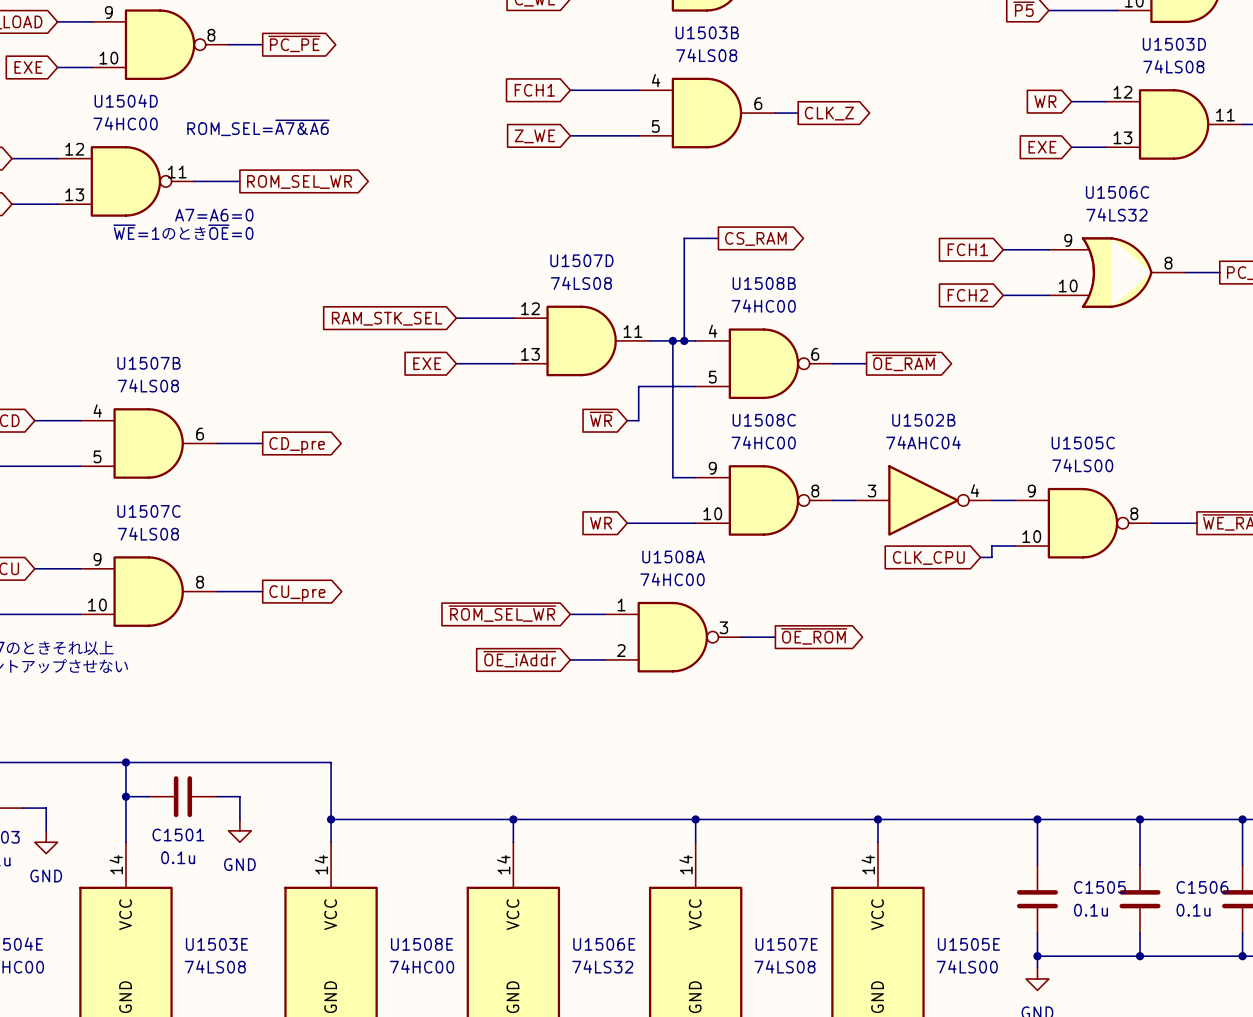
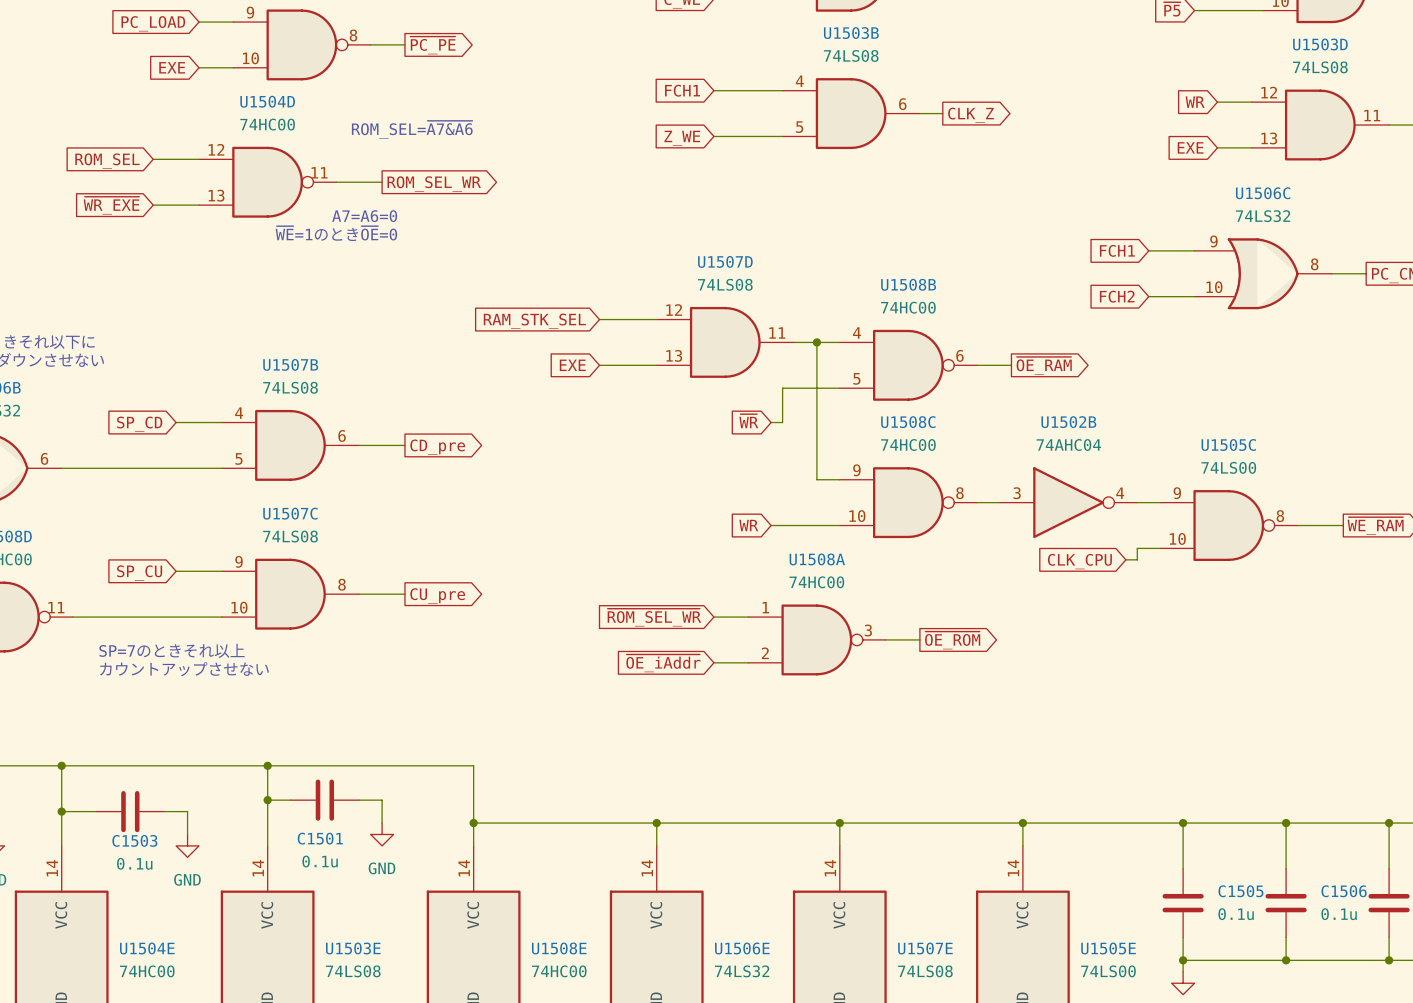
wire: (718, 238) (684, 238) (684, 340) -> none
global label: CS_RAM (755, 238) -> none
junction: (684, 340) -> none

